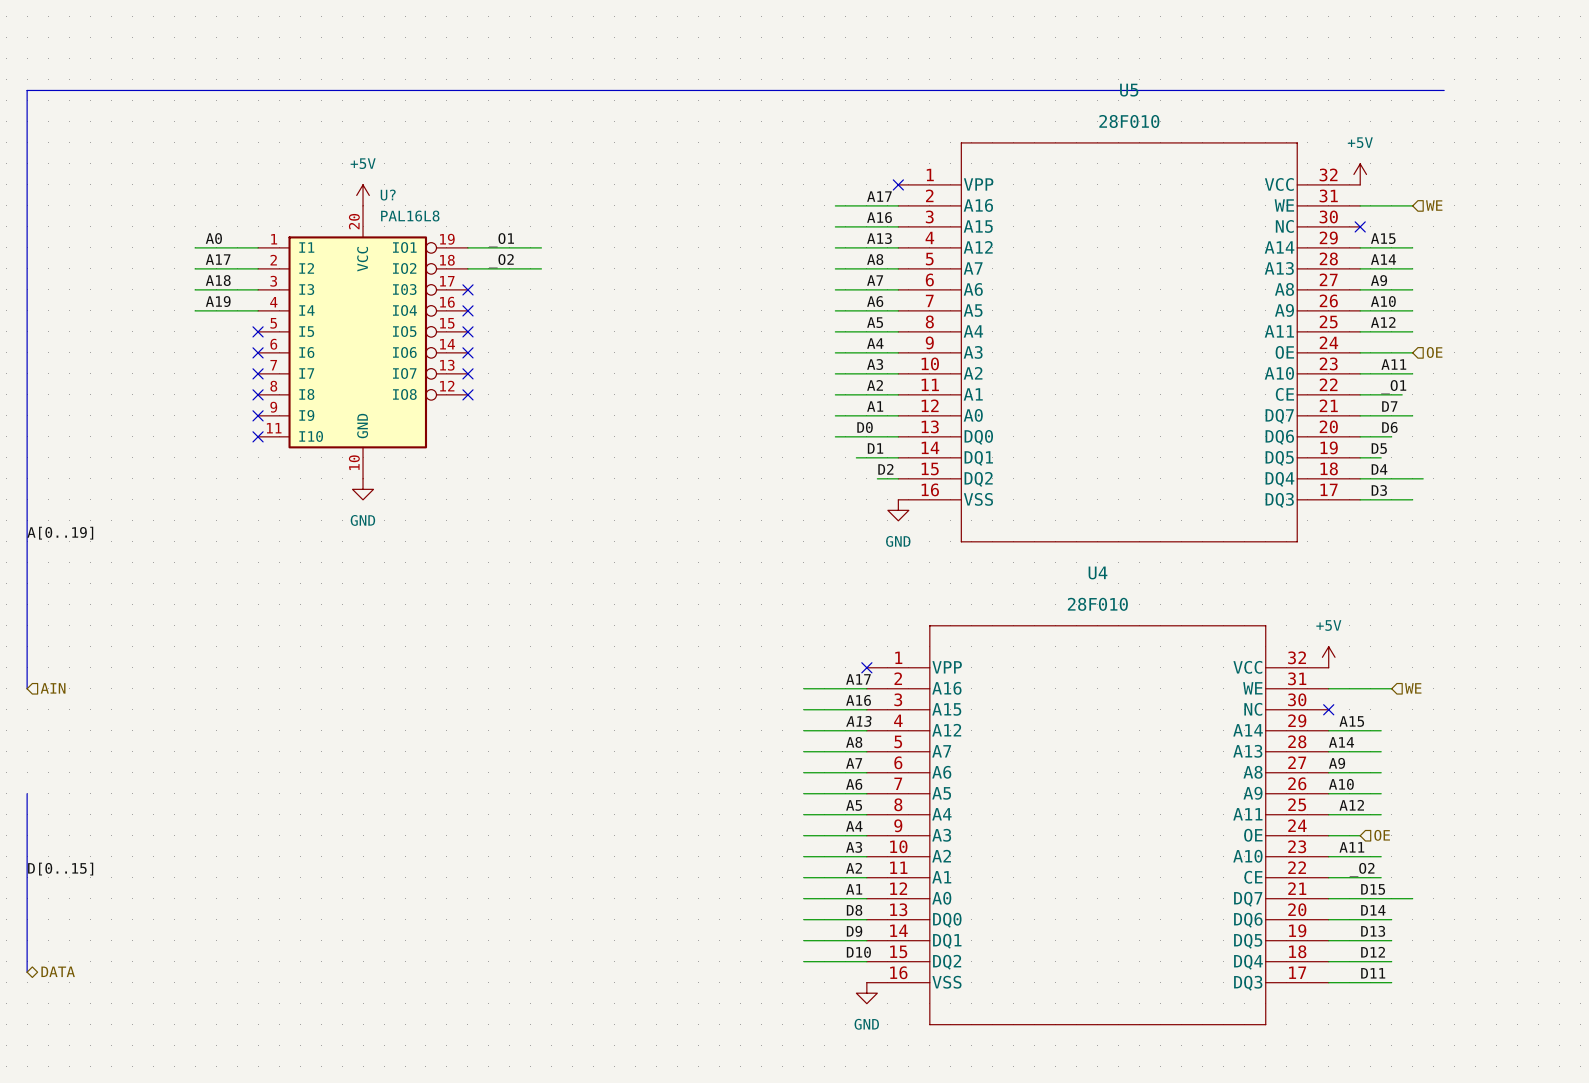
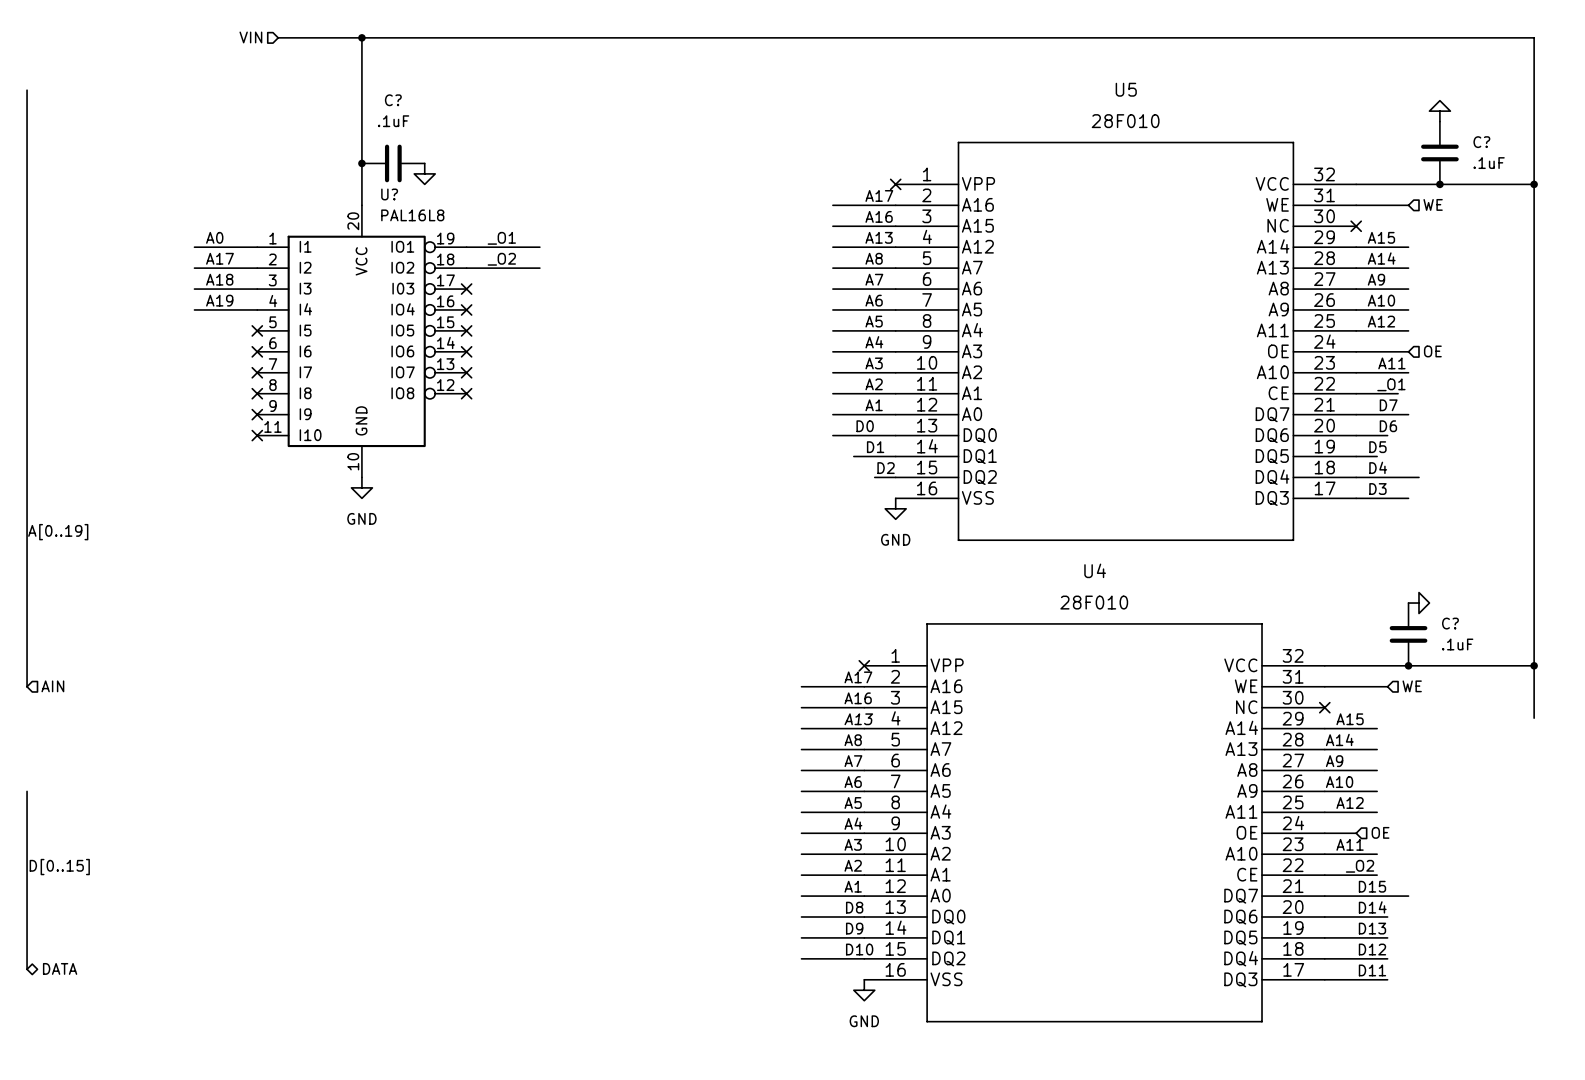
hierarchical label: none -> VIN (250, 37)
wire: none -> (278, 37) (1534, 37) (1534, 718)
wire: none -> (361, 37) (361, 205)
junction: none -> (361, 37)
bus: (27, 90) (1444, 90) -> none
power symbol: none -> (1439, 111)
C?: none -> .1uF (1439, 152)
junction: none -> (361, 163)
C?: none -> .1uF (393, 163)
power symbol: none -> (424, 173)
power symbol: +5V (1360, 174) -> none
wire: none -> (1356, 184) (1534, 184)
junction: none -> (1439, 184)
junction: none -> (1534, 184)
power symbol: +5V (363, 195) -> none
power symbol: none -> (1418, 603)
C?: none -> .1uF (1408, 634)
power symbol: +5V (1328, 657) -> none
wire: none -> (1324, 665) (1534, 665)
junction: none -> (1408, 665)
junction: none -> (1534, 665)

